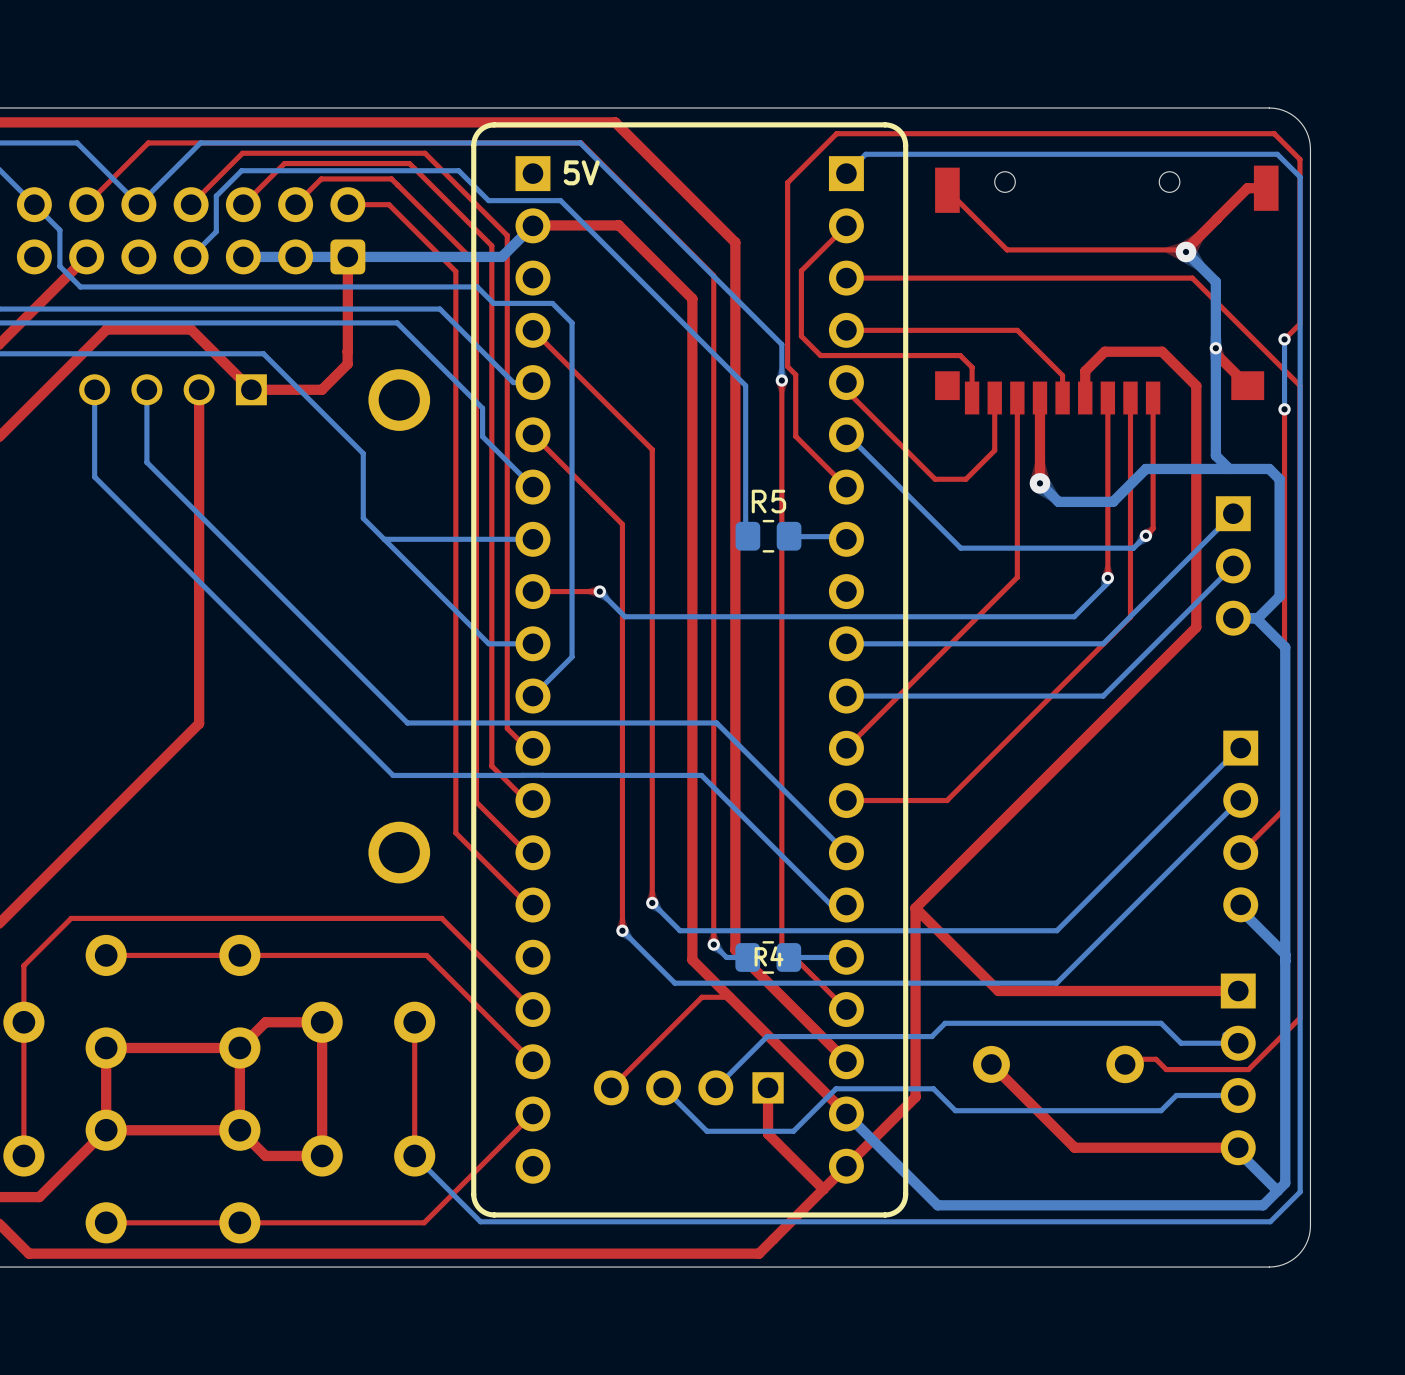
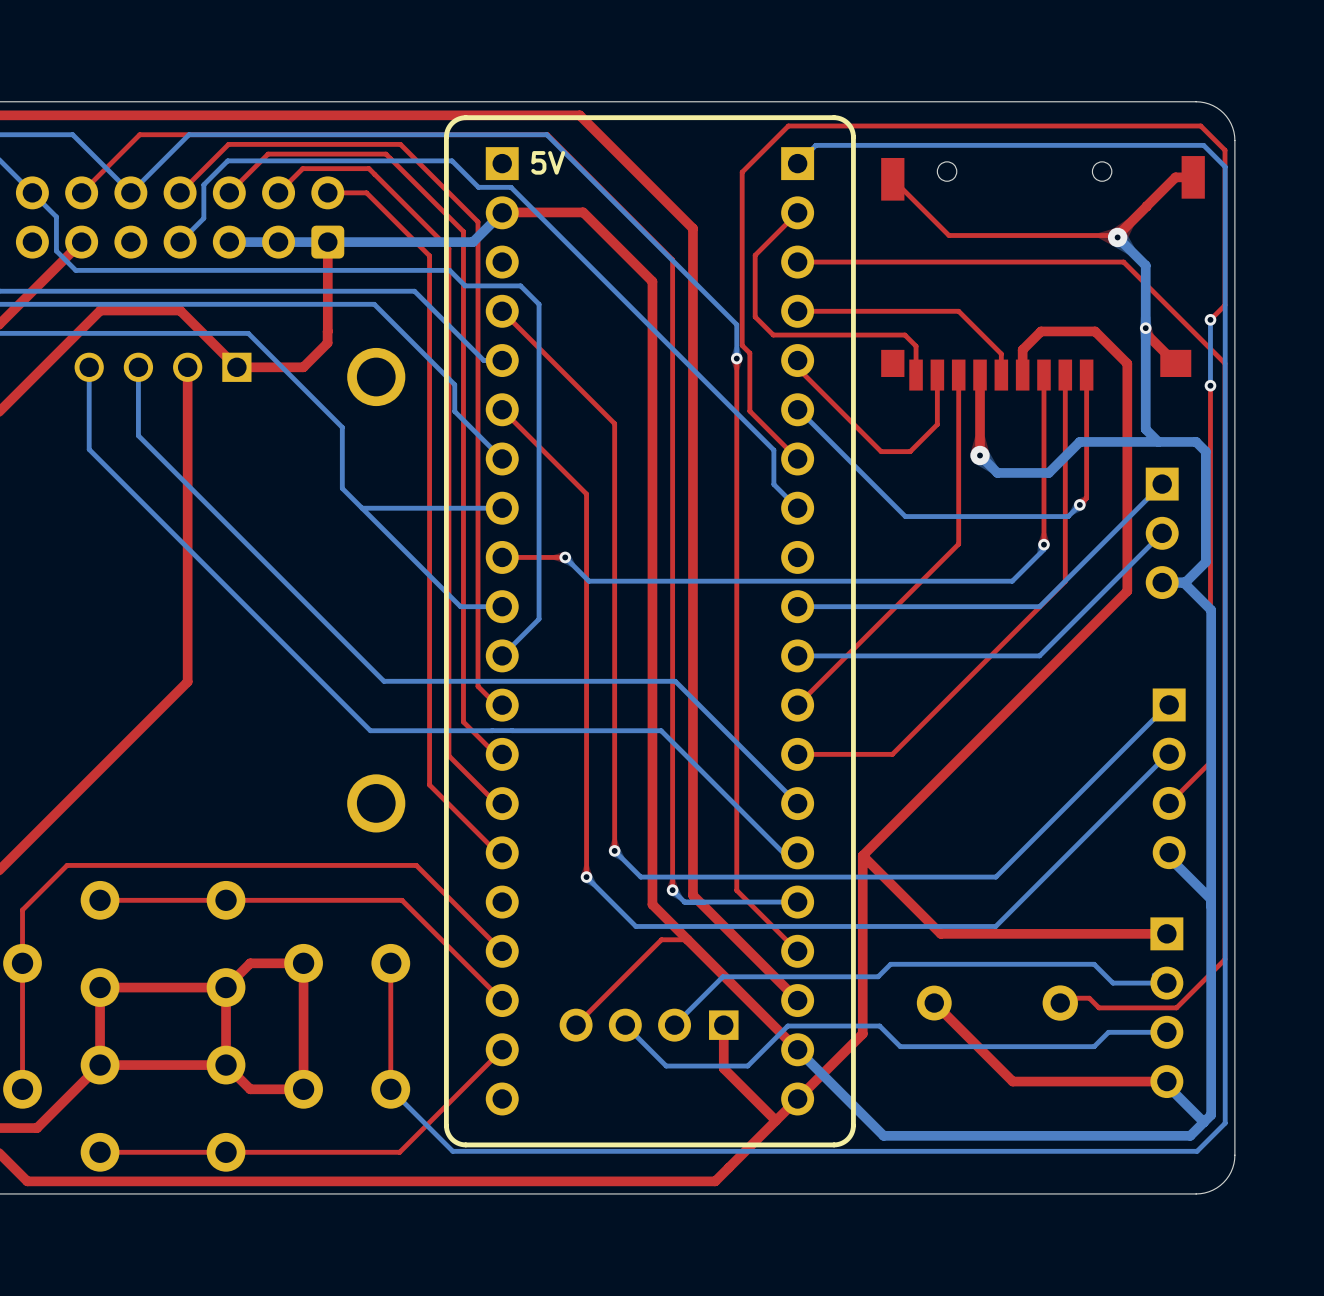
bottom track: (458, 170) (488, 200) (560, 200) (745, 385) (745, 530) (751, 536) -> (432, 160) (452, 160) (478, 187) (511, 187) (773, 450) (773, 484) (795, 505)
R5: (768, 536) -> none
bottom track: (843, 536) (792, 536) -> none
R4: (768, 957) -> none
bottom track: (846, 957) (788, 957) -> (797, 902) (684, 902)

